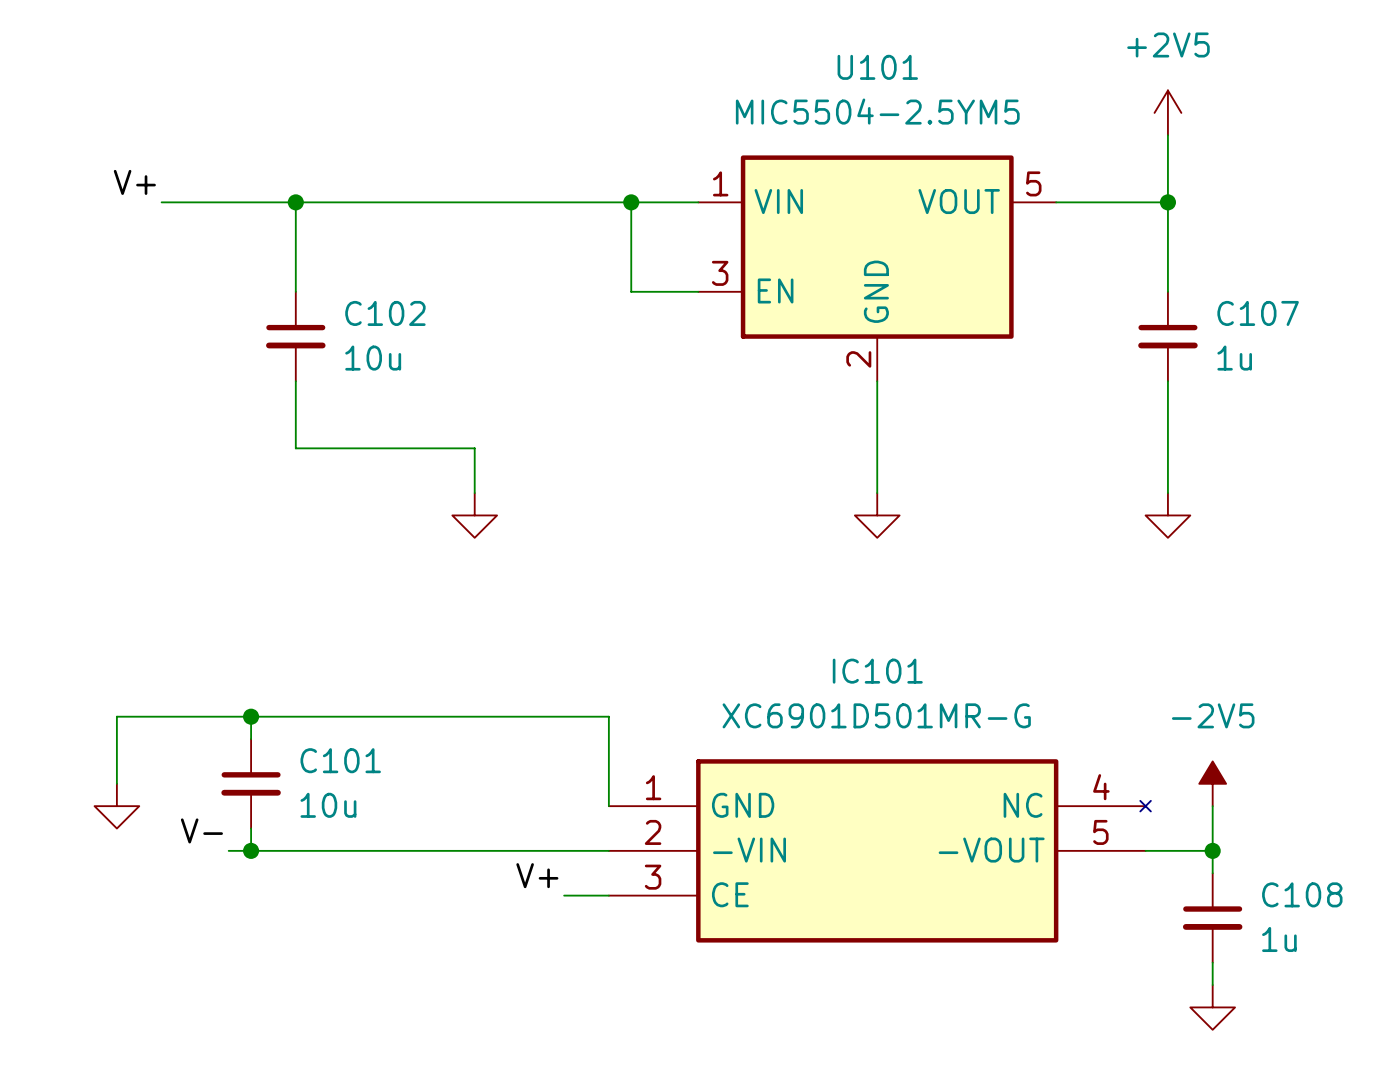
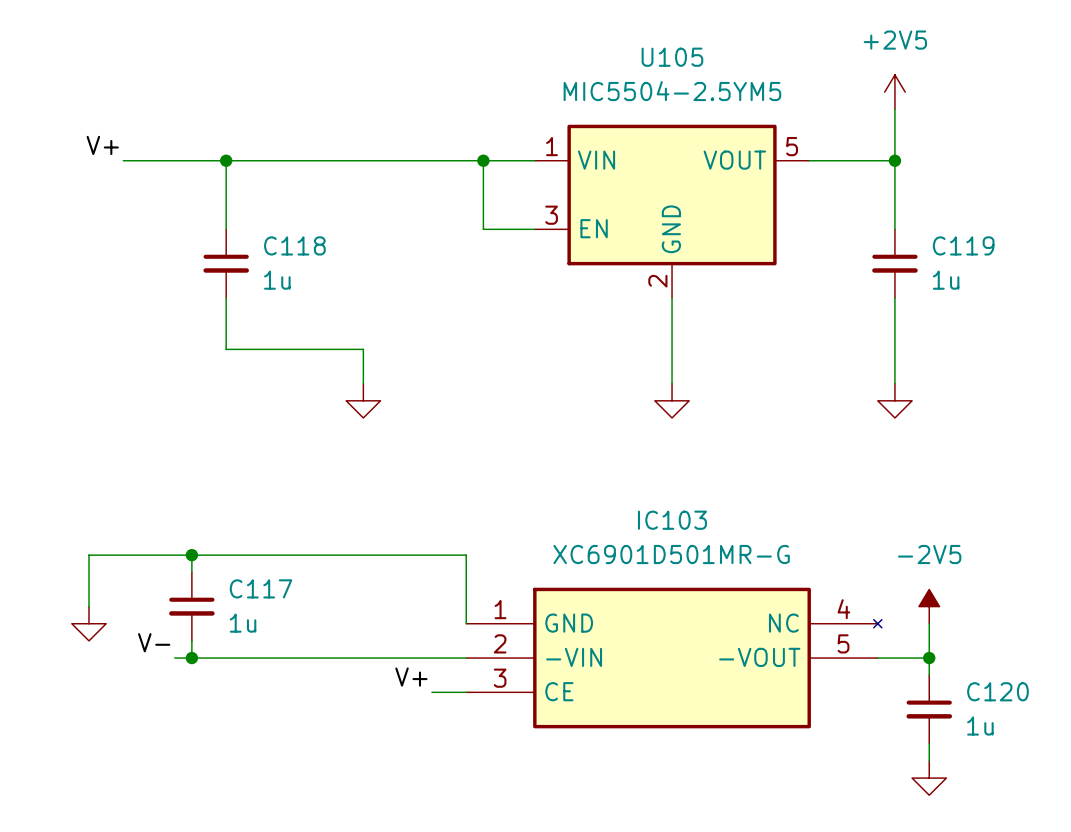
U101 name: U101 (877, 67) -> U105 (672, 57)
C102 name: C102 (385, 313) -> C118 (294, 245)
C107 name: C107 (1258, 313) -> C119 (963, 245)
C102 value: 10u (373, 358) -> 1u (277, 280)
IC101 name: IC101 (877, 671) -> IC103 (672, 520)
C101 name: C101 (340, 760) -> C117 (261, 588)
C101 value: 10u (328, 805) -> 1u (243, 623)
C108 name: C108 (1302, 894) -> C120 (997, 691)

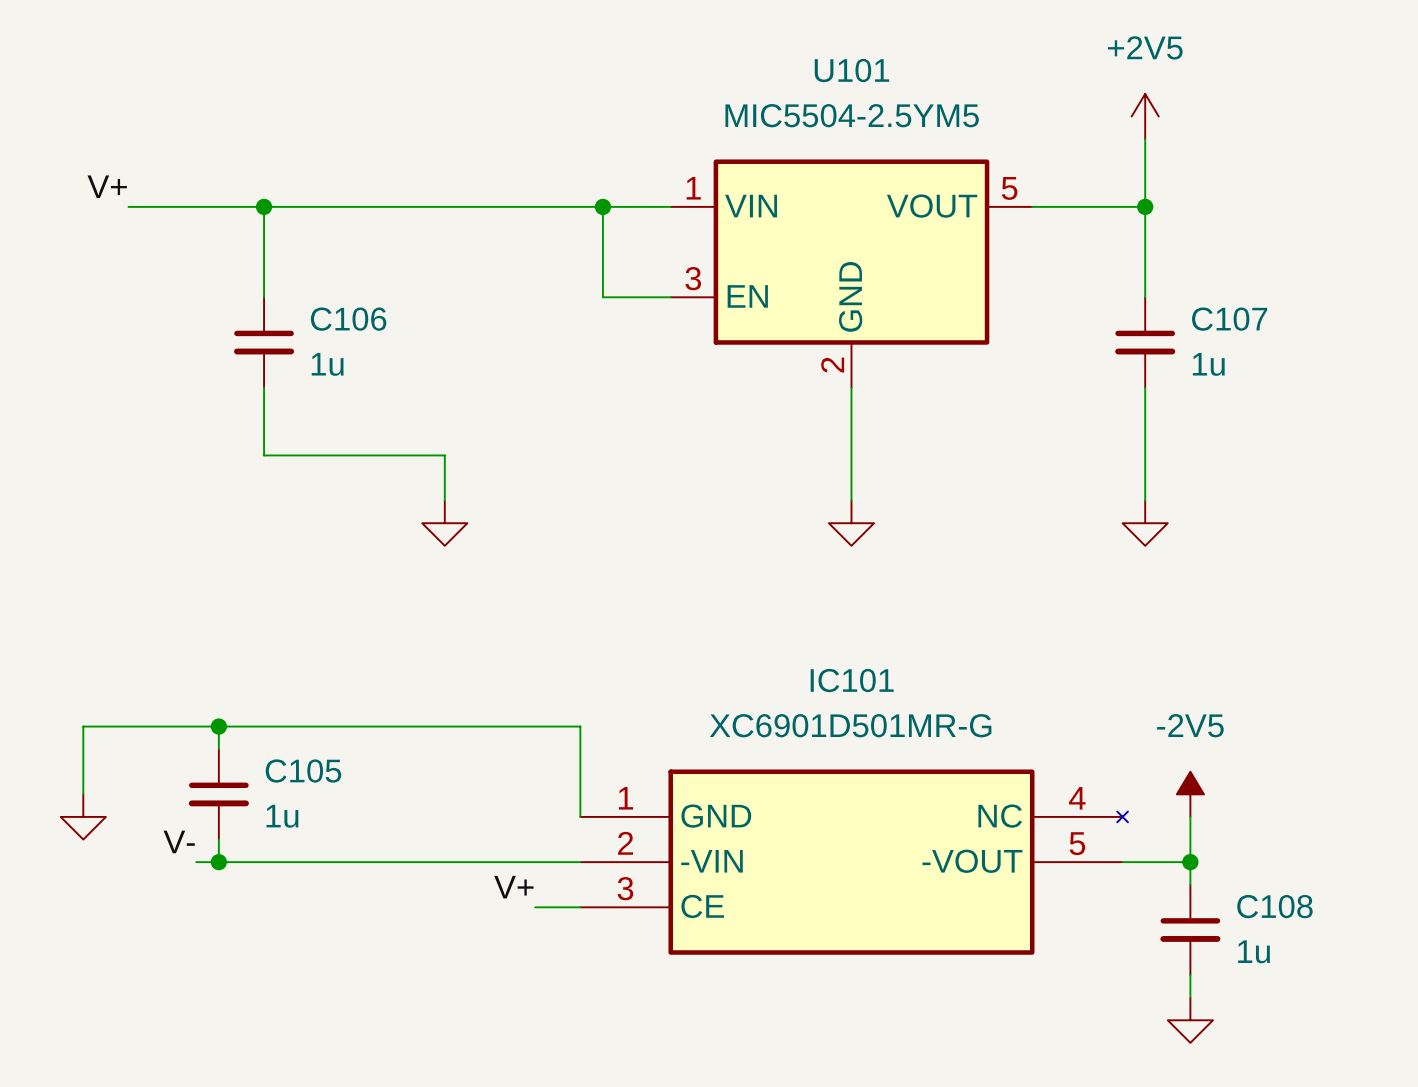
U105 name: U105 (672, 57) -> U101 (851, 70)
C118 name: C118 (294, 245) -> C106 (348, 319)
C119 name: C119 (963, 245) -> C107 (1229, 319)
IC103 name: IC103 (672, 520) -> IC101 (852, 680)
C117 name: C117 (261, 588) -> C105 (303, 771)
C120 name: C120 (997, 691) -> C108 (1274, 906)

